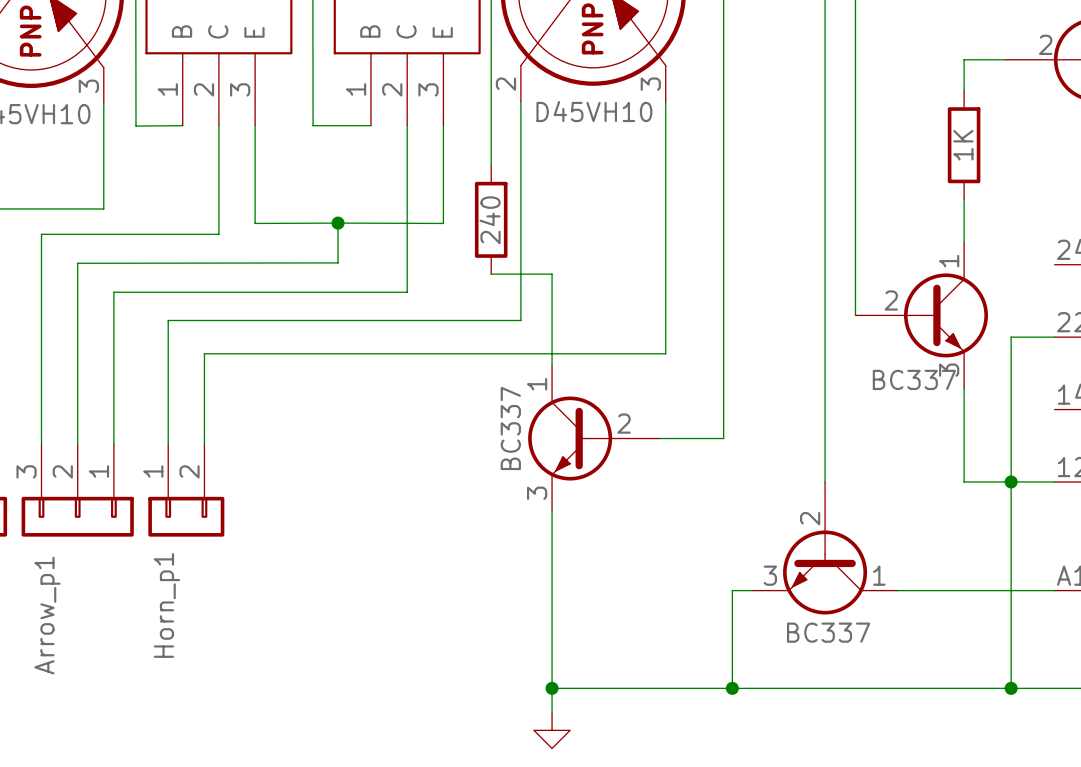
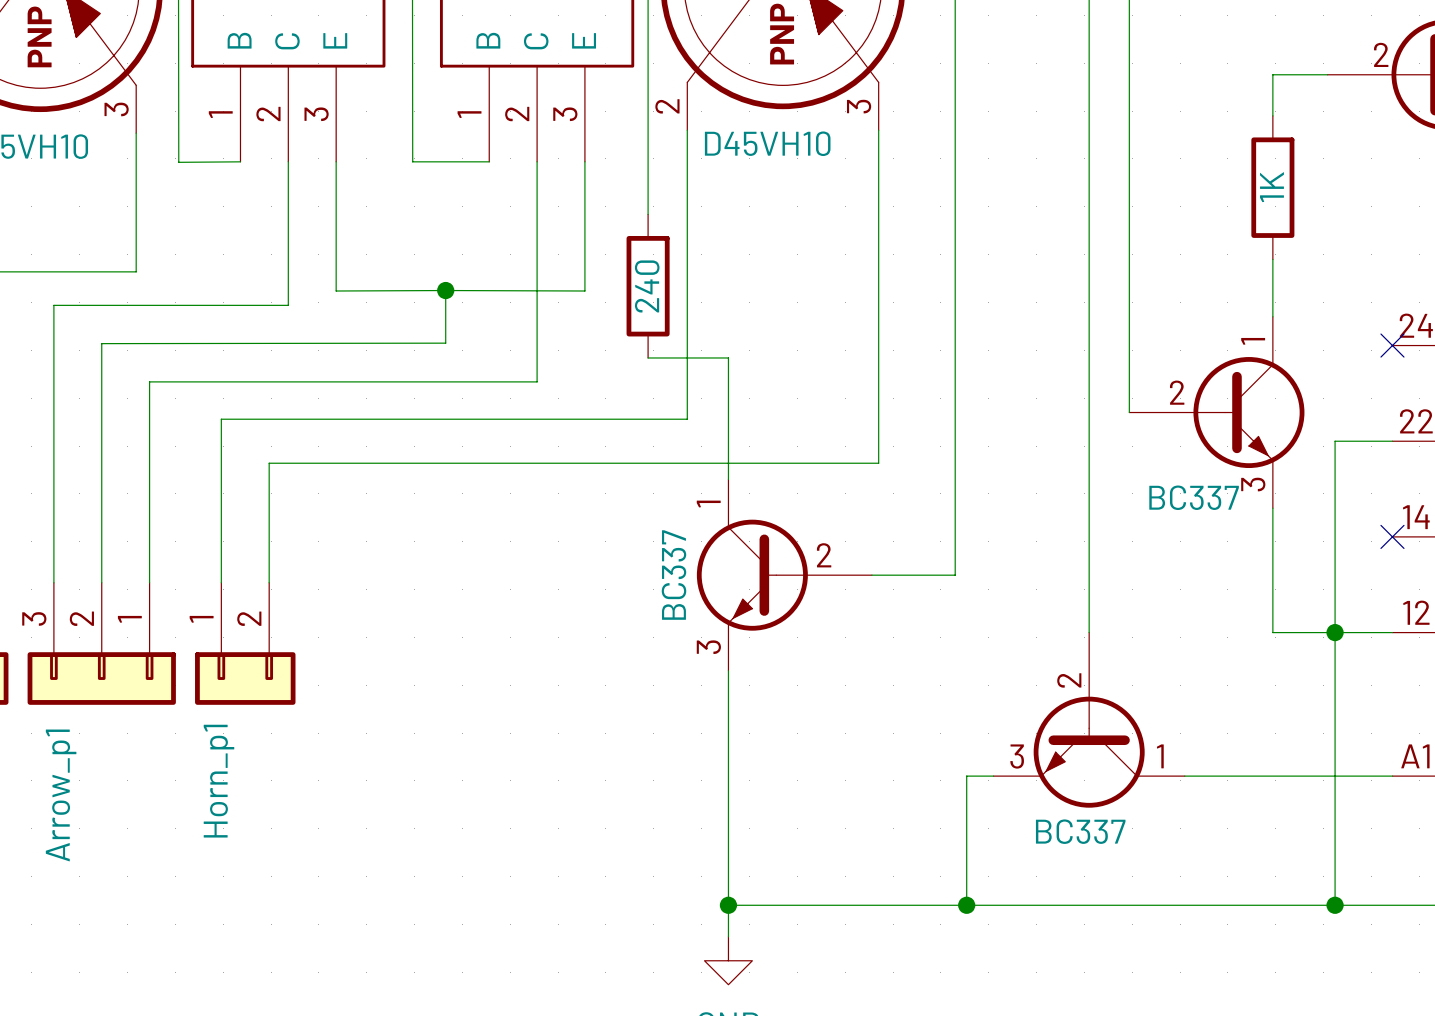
no-connect mark: none -> (1392, 345)
no-connect mark: none -> (1392, 536)

